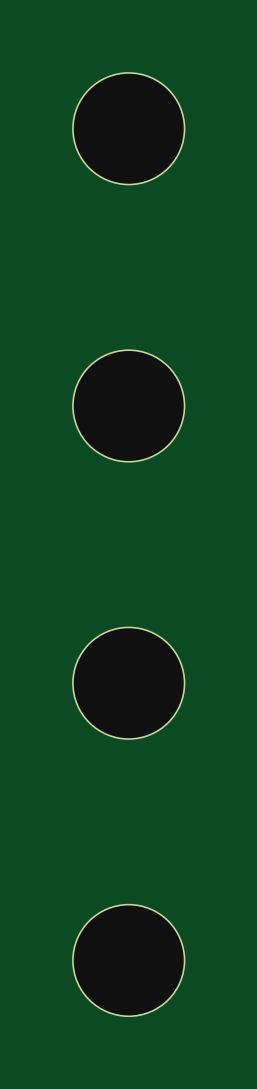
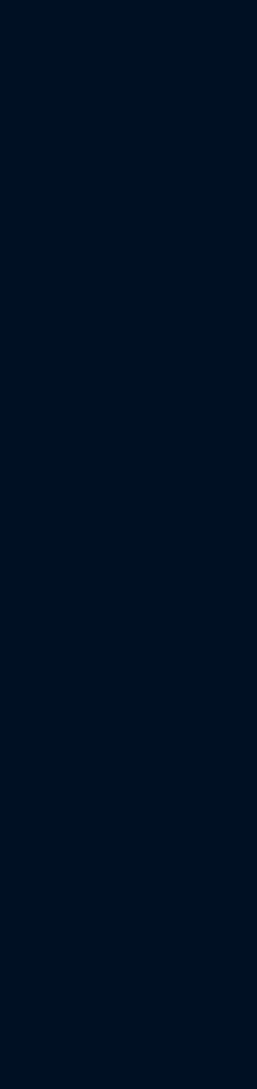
part: (128, 128) -> none
part: (128, 405) -> none
part: (128, 683) -> none
part: (128, 960) -> none

